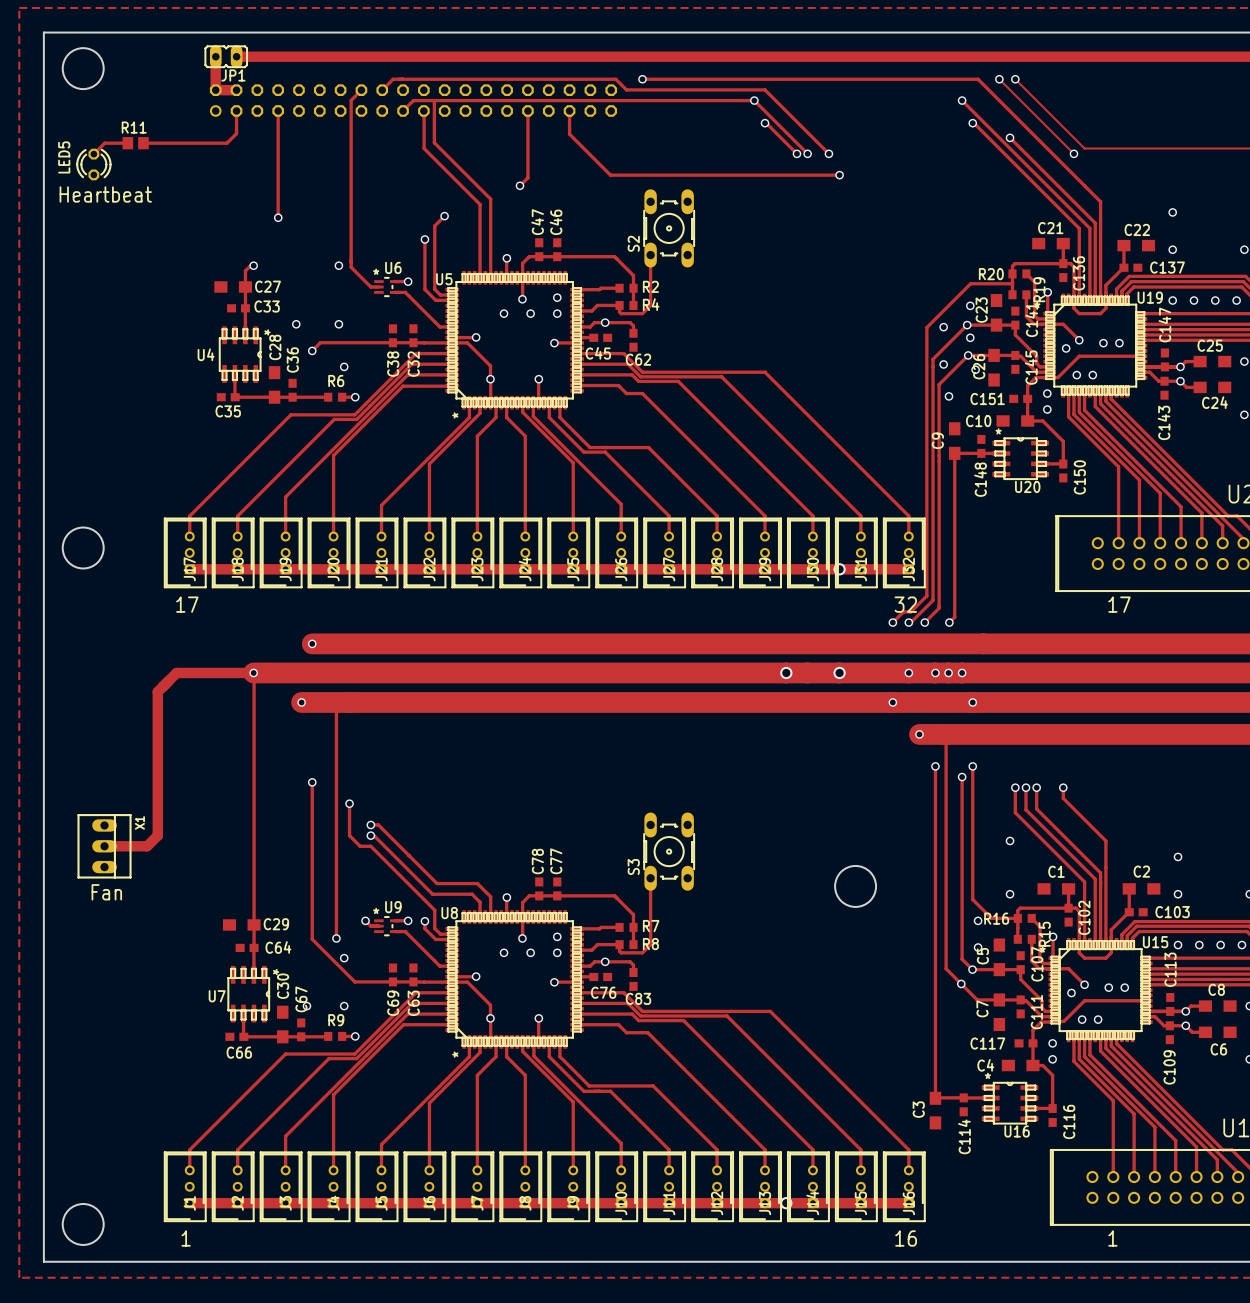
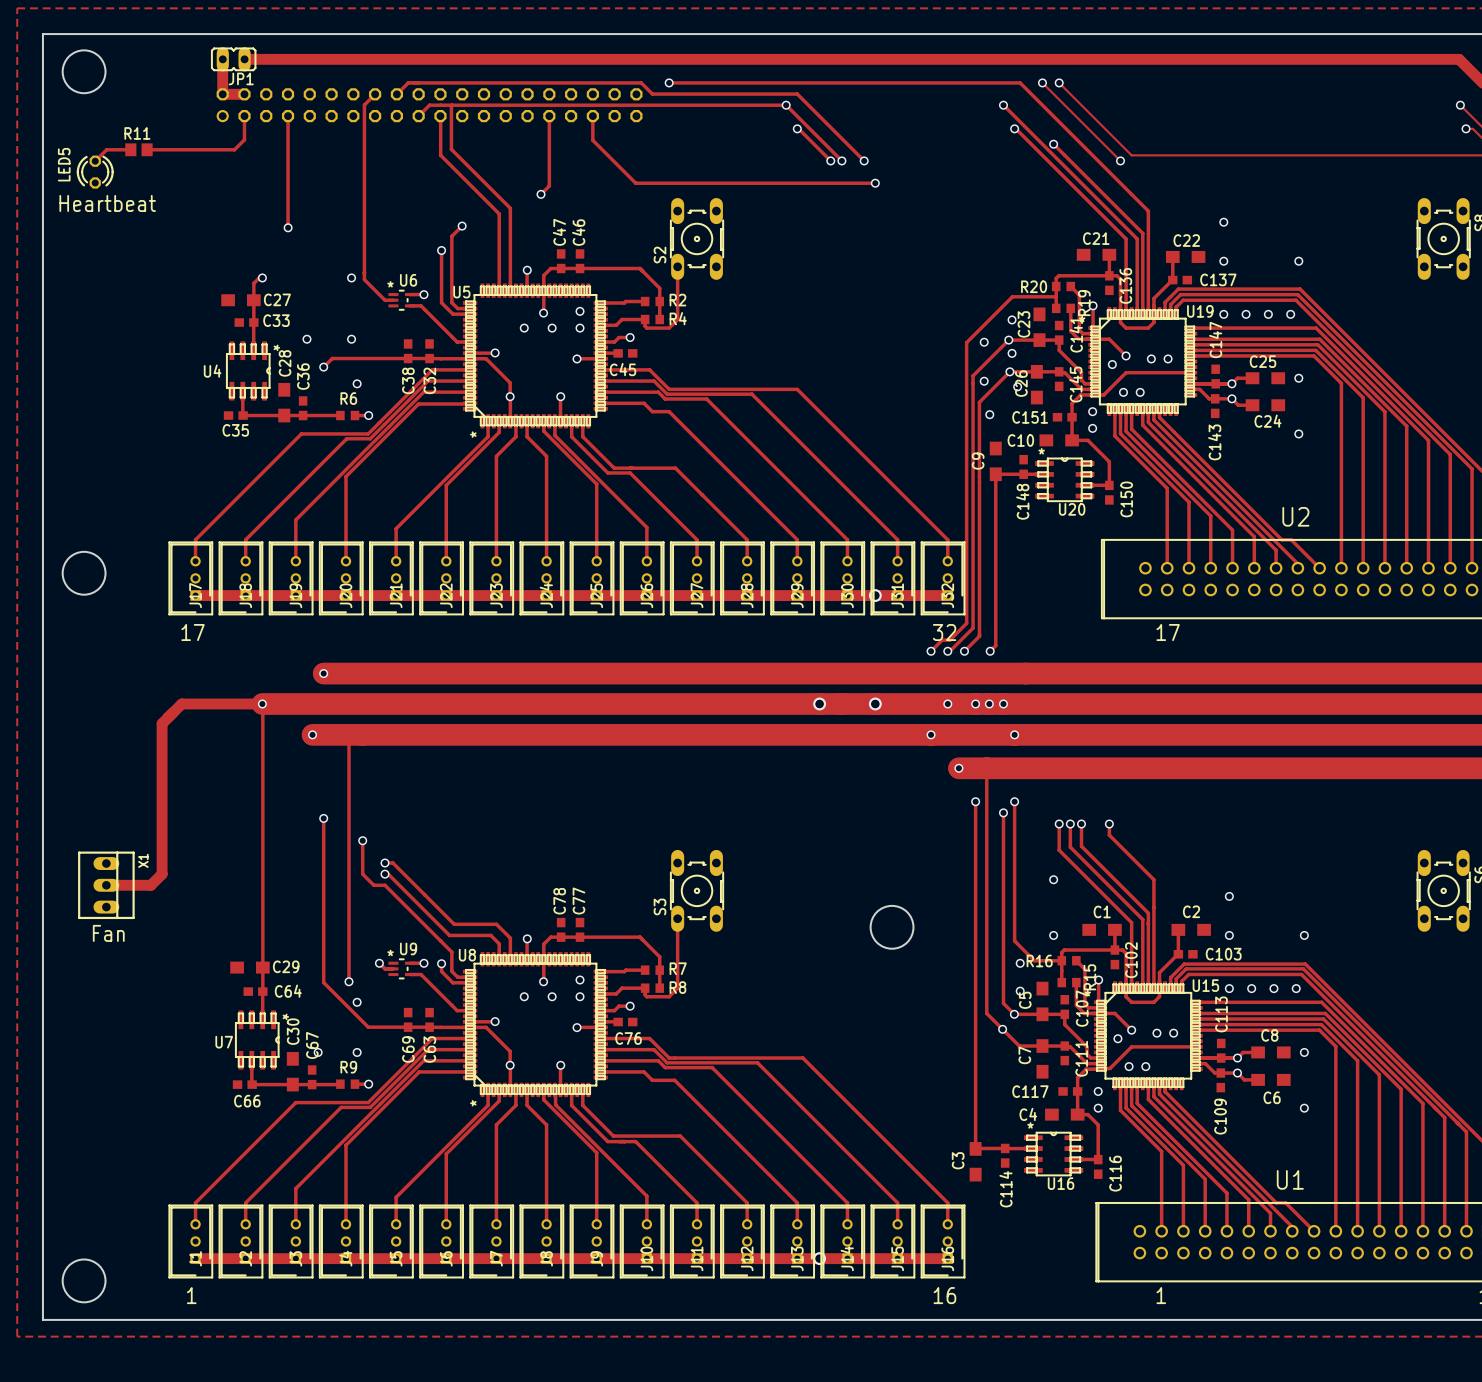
track: (605, 322) (630, 322) (633, 325) (633, 333) -> none
C62: (633, 340) -> none
track: (605, 961) (630, 961) (633, 965) (633, 972) -> none
C83: (633, 979) -> none

